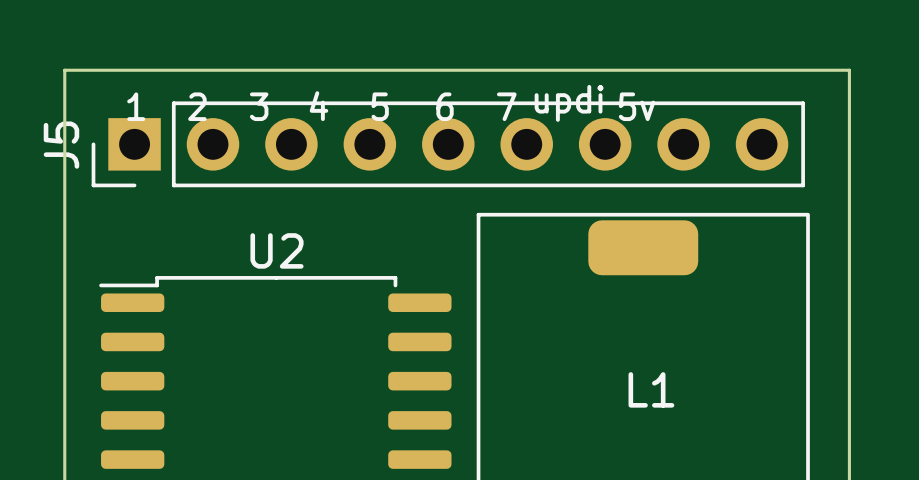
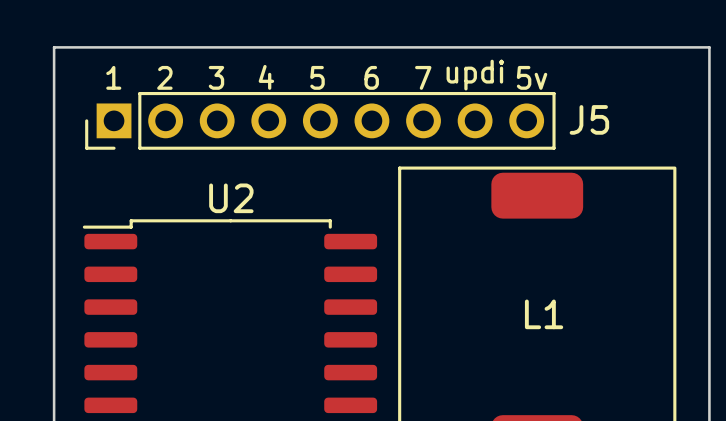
J5 footprint: [91, 101, 805, 188] -> [85, 91, 556, 150]
J5 name position: J5 (61, 145) -> J5 (589, 119)

